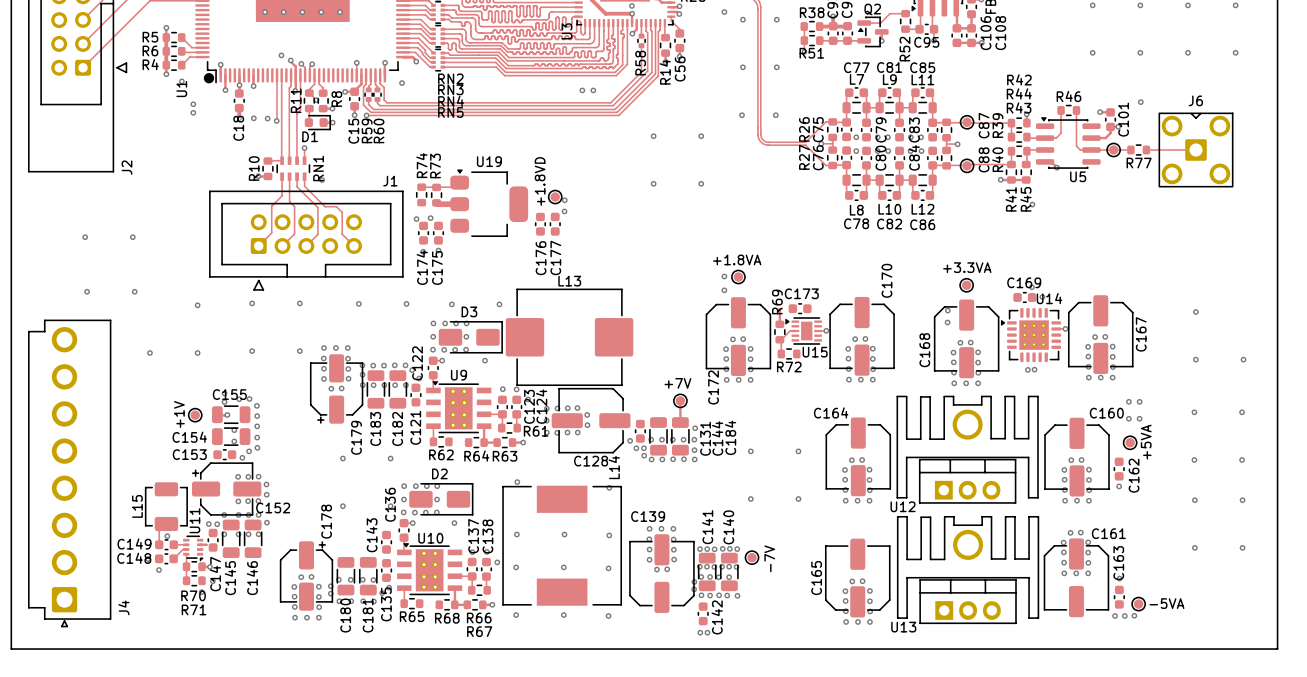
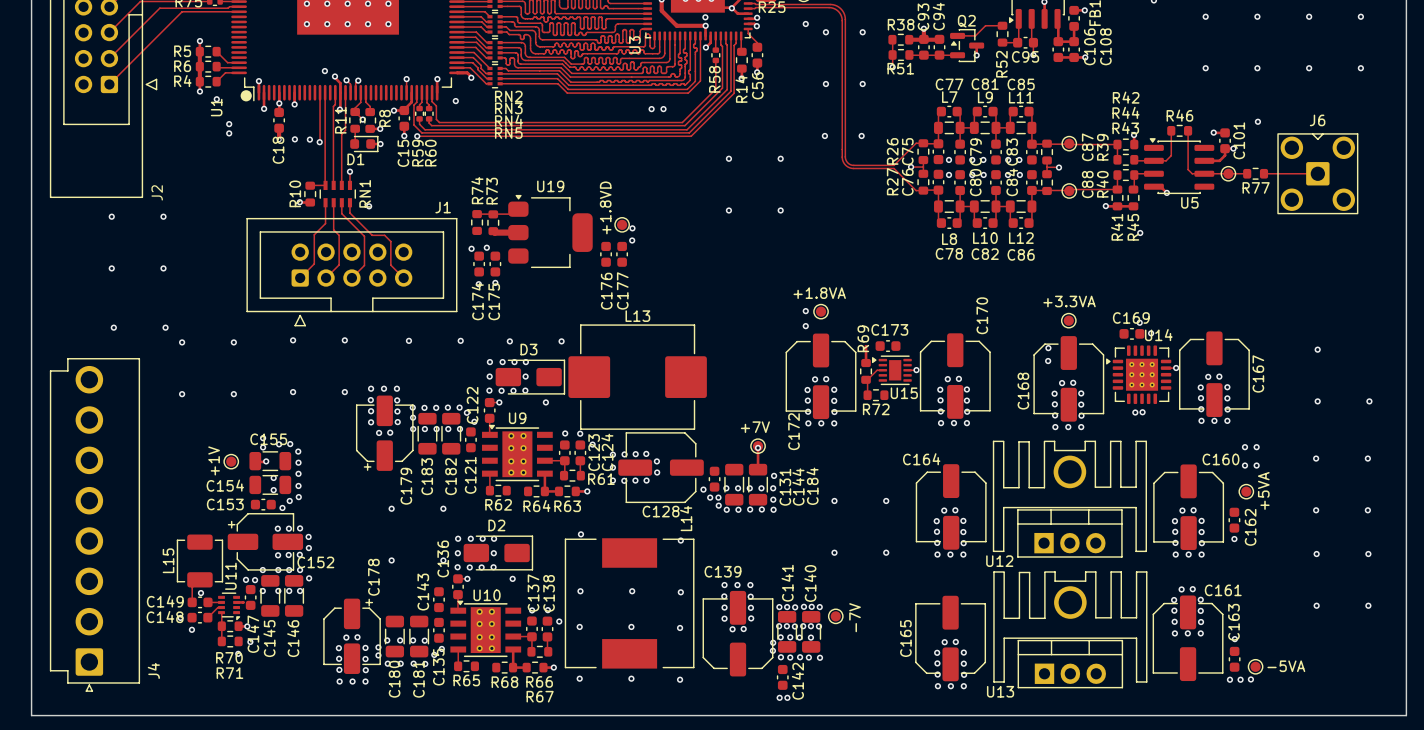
via: none -> (111, 216)
via: none -> (163, 216)
via: none -> (182, 342)
via: none -> (758, 447)

